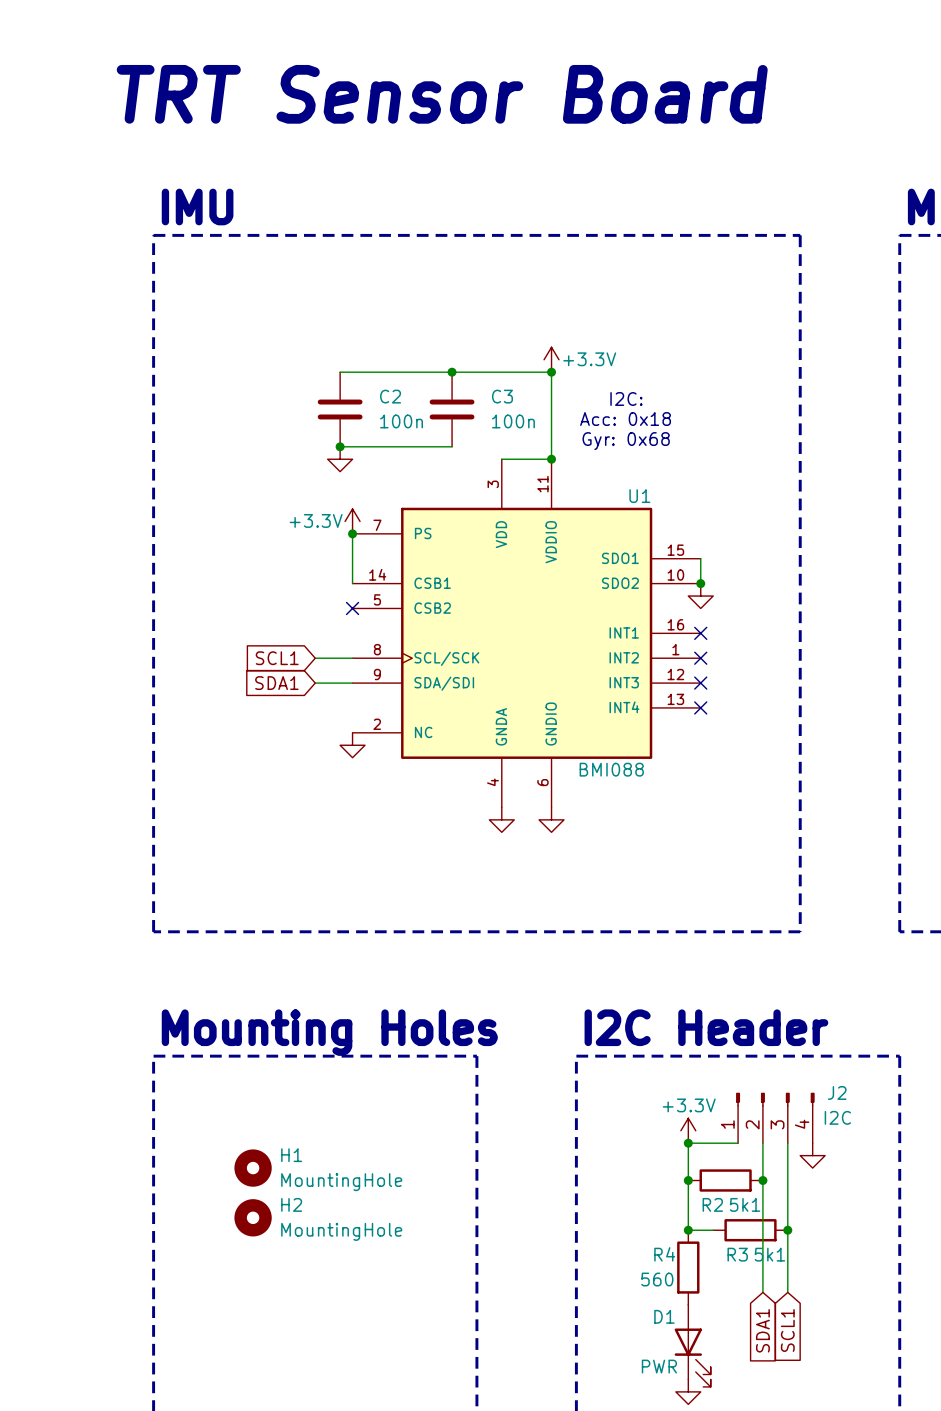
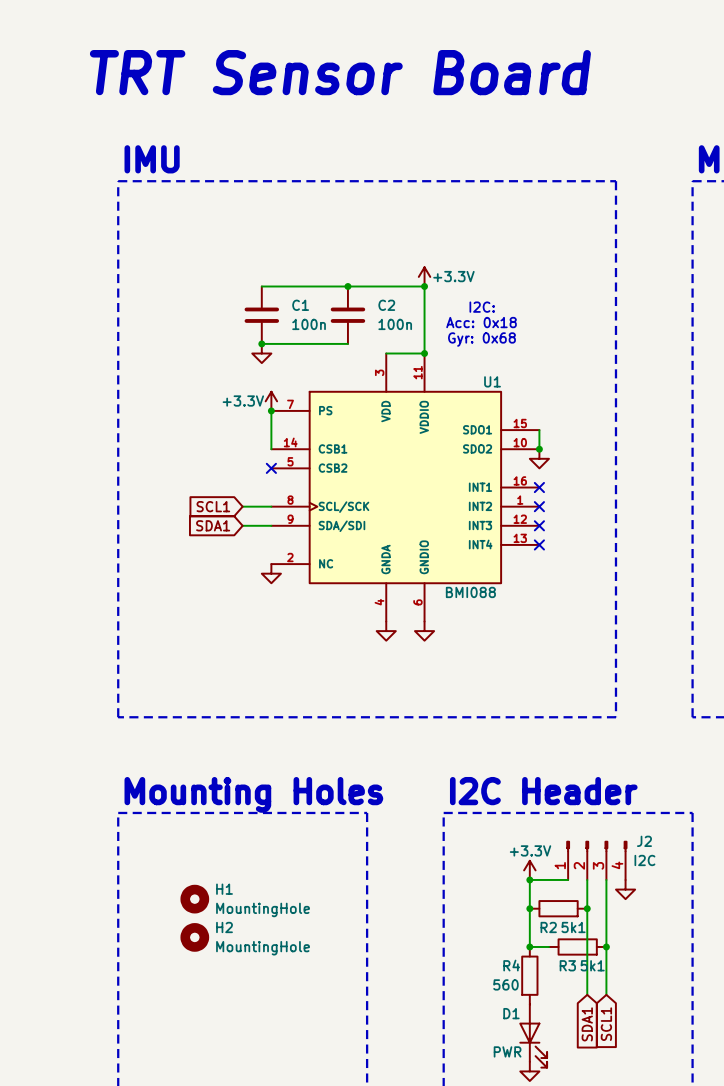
C2 name: C2 (390, 396) -> C1 (300, 305)
C3 name: C3 (502, 396) -> C2 (386, 305)

